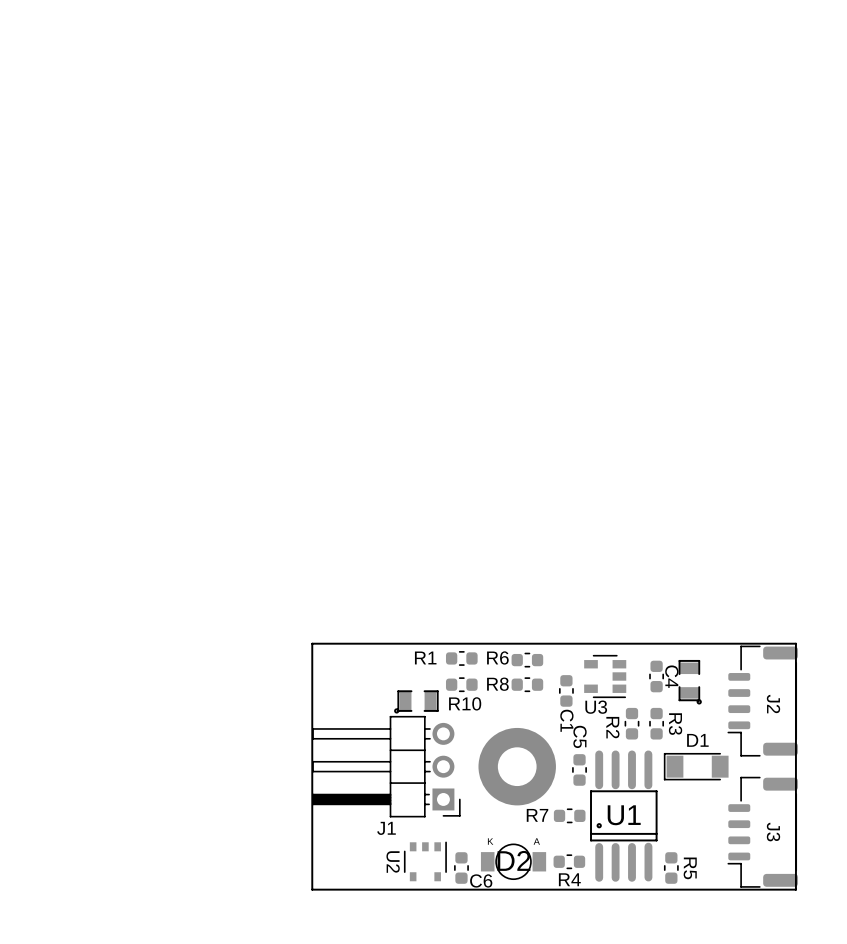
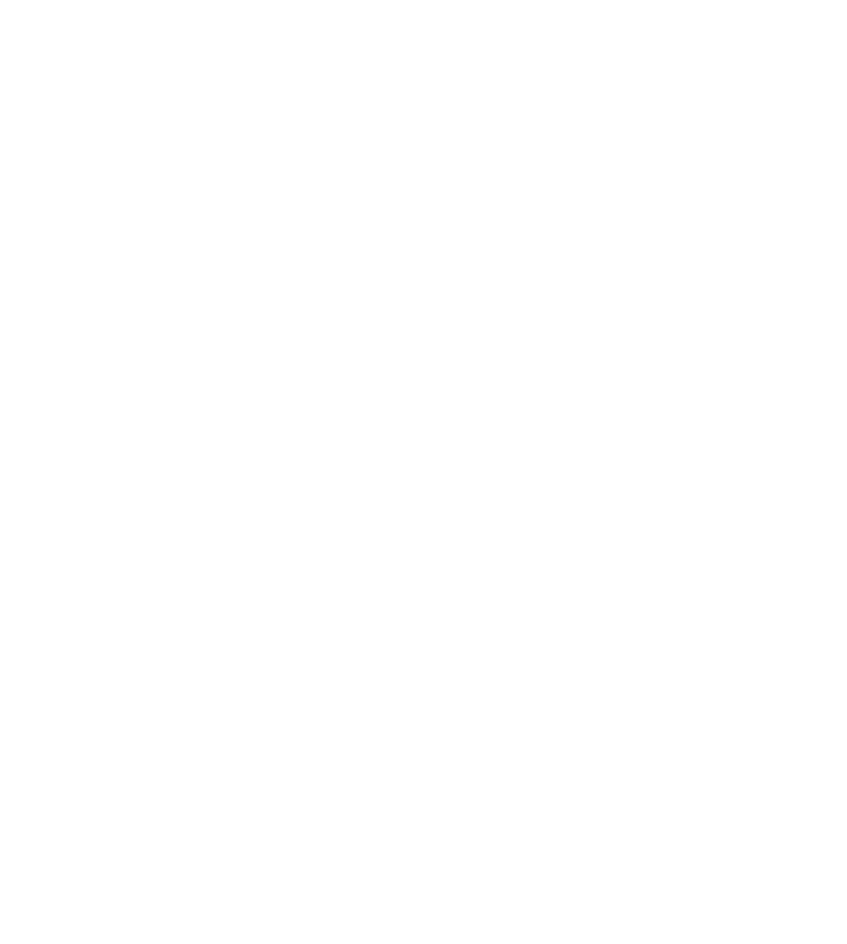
board edge: (795, 643) (312, 643) (312, 889) (795, 889) (795, 643) -> none
R1: (461, 658) -> none
R6: (527, 660) -> none
U3: (605, 676) -> none
C4: (656, 676) -> none
part: (690, 682) -> none
R10: (461, 684) -> none
R8: (527, 684) -> none
C1: (566, 690) -> none
part: (416, 701) -> none
J2: (762, 701) -> none
R2: (631, 723) -> none
R3: (656, 723) -> none
J1: (386, 766) -> none
part: (517, 766) -> none
D1: (696, 766) -> none
C5: (579, 769) -> none
R7: (569, 815) -> none
U1: (623, 816) -> none
J3: (762, 832) -> none
U2: (425, 861) -> none
D2: (513, 861) -> none
R4: (569, 861) -> none
C6: (461, 868) -> none
R5: (671, 868) -> none

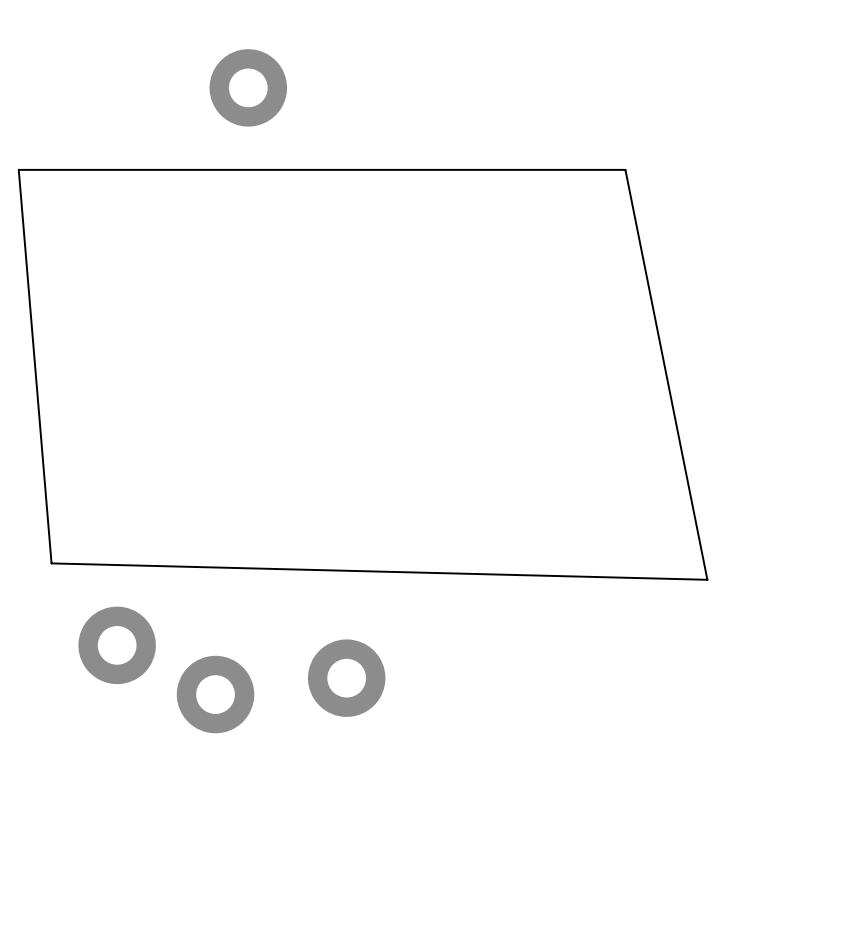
part: none -> (248, 87)
board edge: none -> (625, 169) (707, 579) (51, 563) (18, 169) (625, 169)
part: none -> (117, 645)
part: none -> (346, 678)
part: none -> (215, 694)

